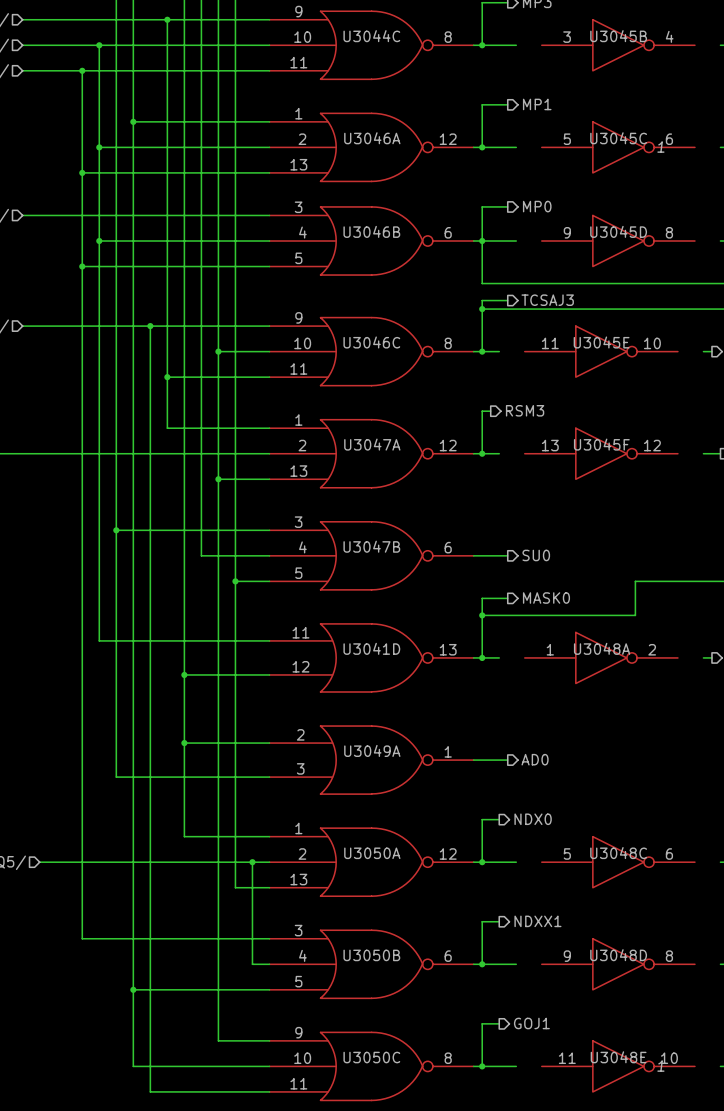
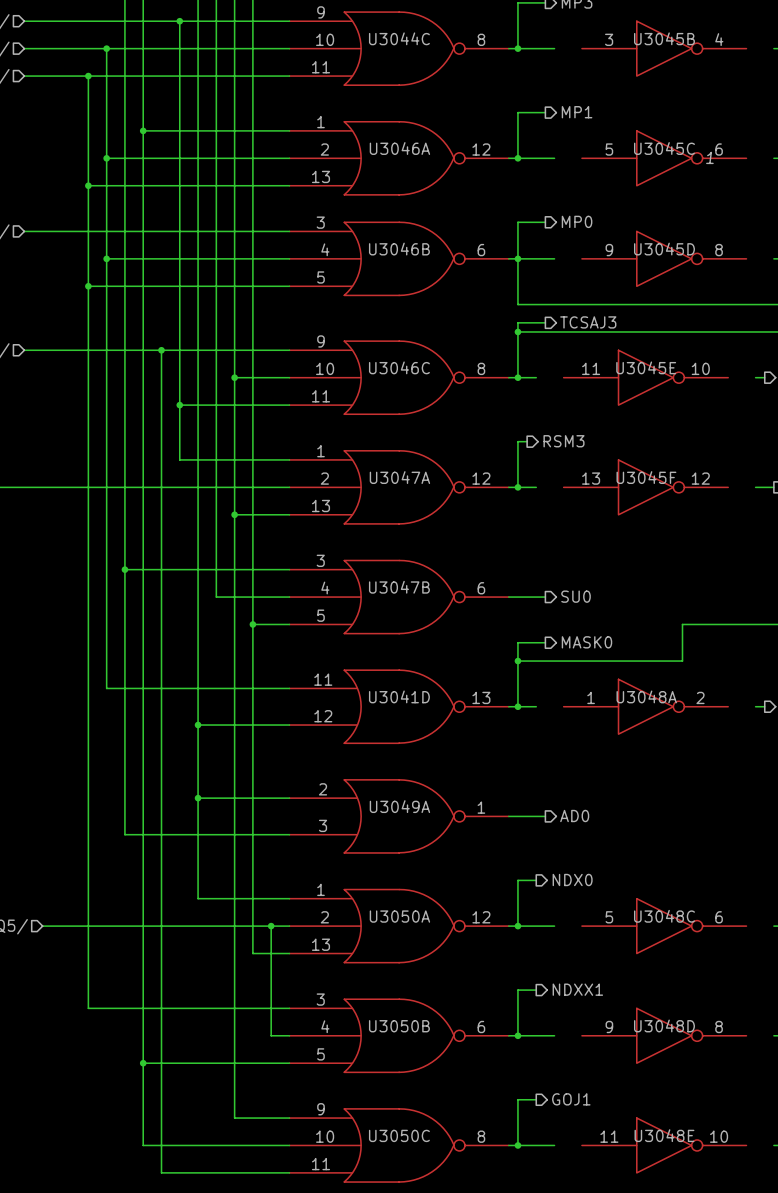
U3048E text: 1 (660, 1066) -> none

